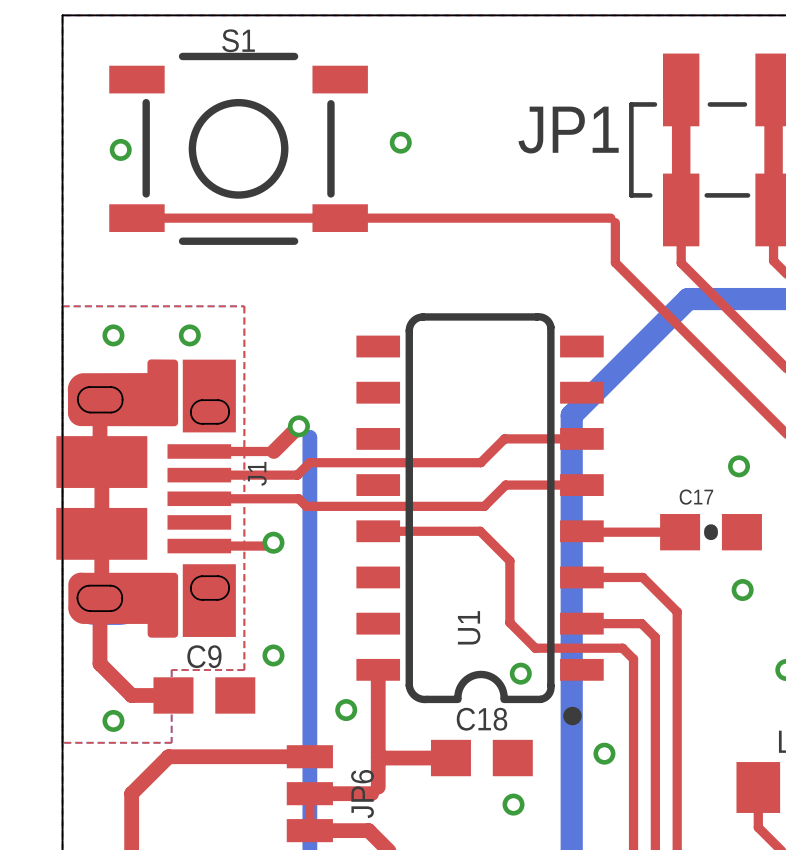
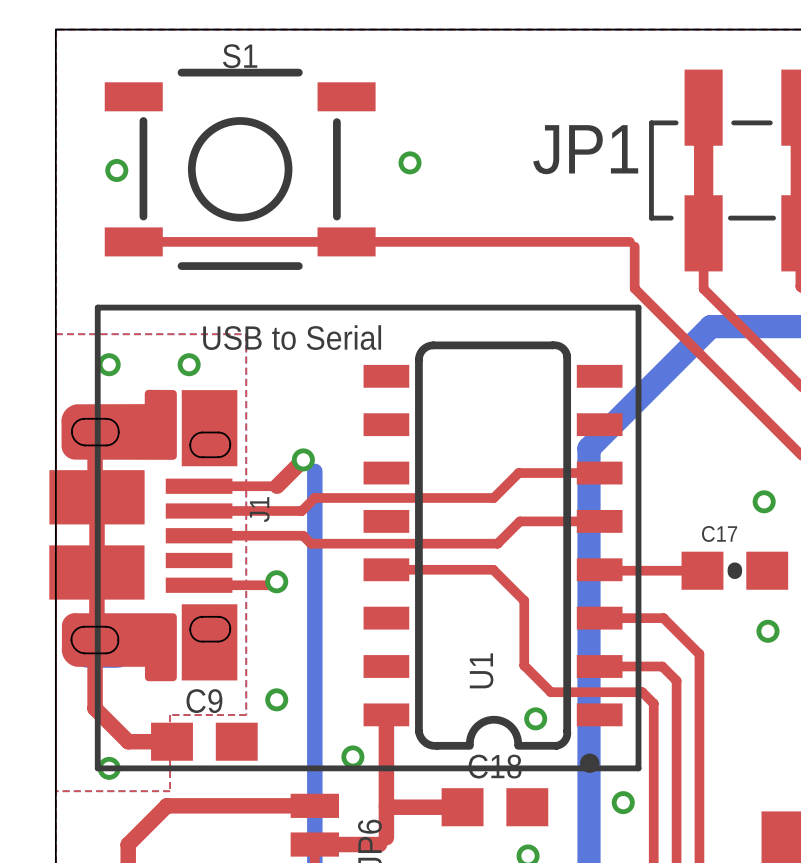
line: none -> (97, 307) (638, 307) (638, 768) (97, 768) (97, 307)
text: none -> USB to Serial (292, 337)

